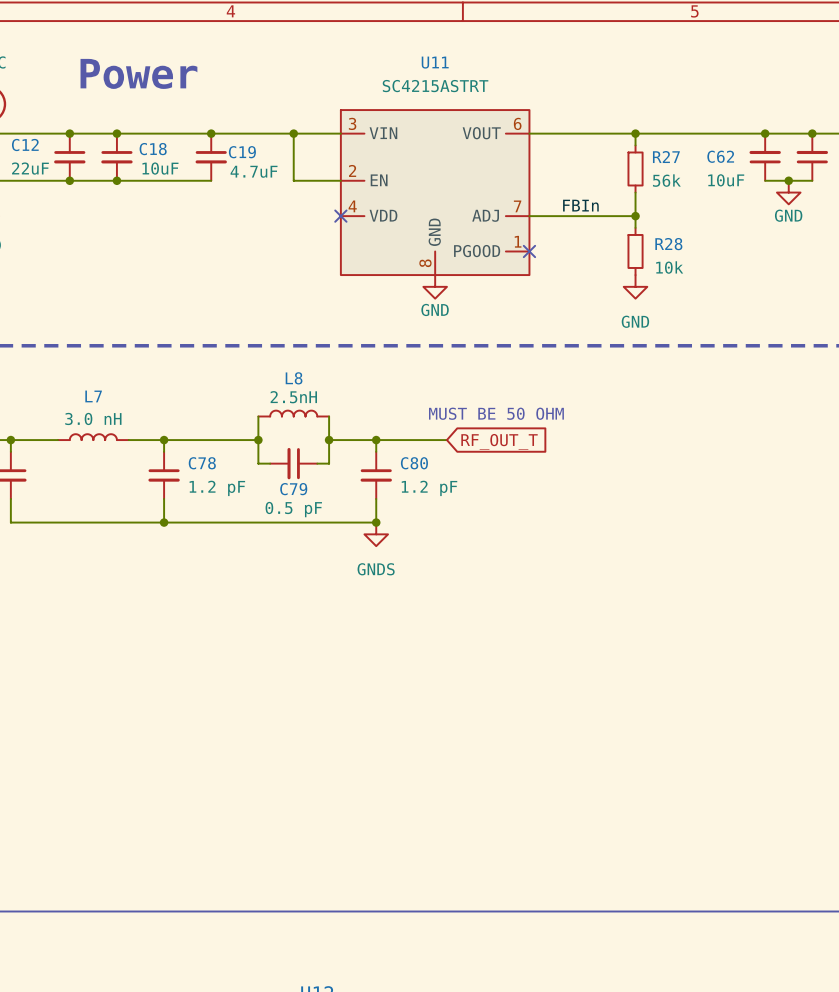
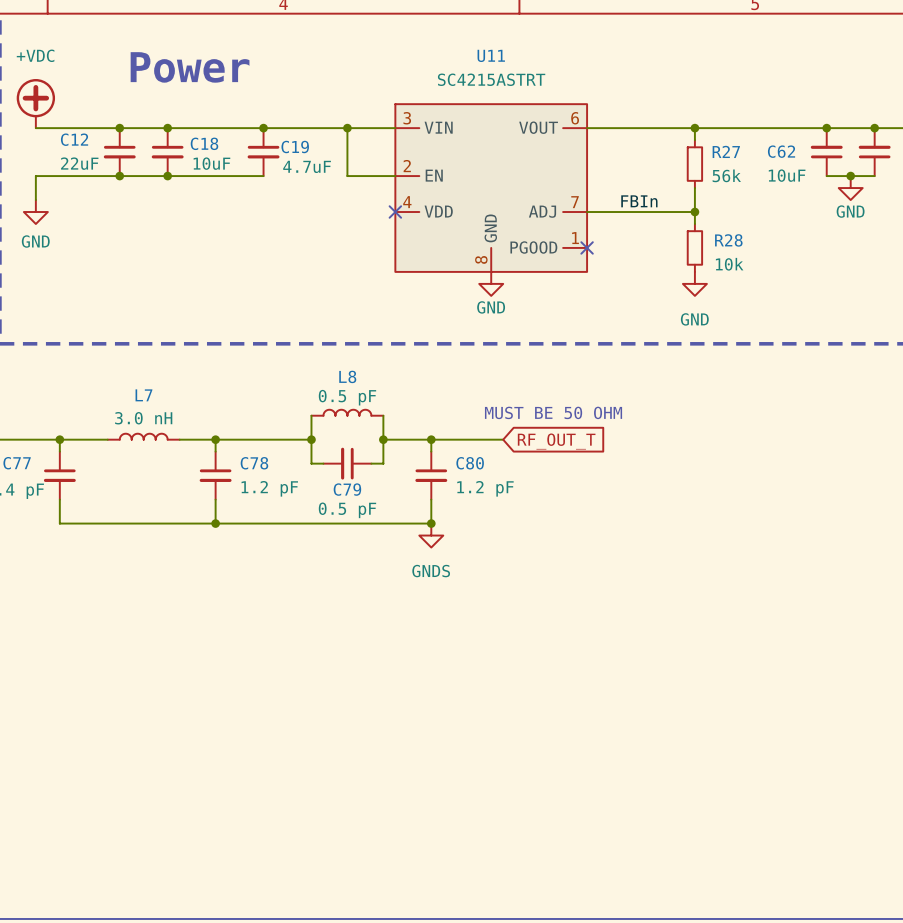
L8 value: 2.5nH (293, 397) -> 0.5 pF (347, 397)

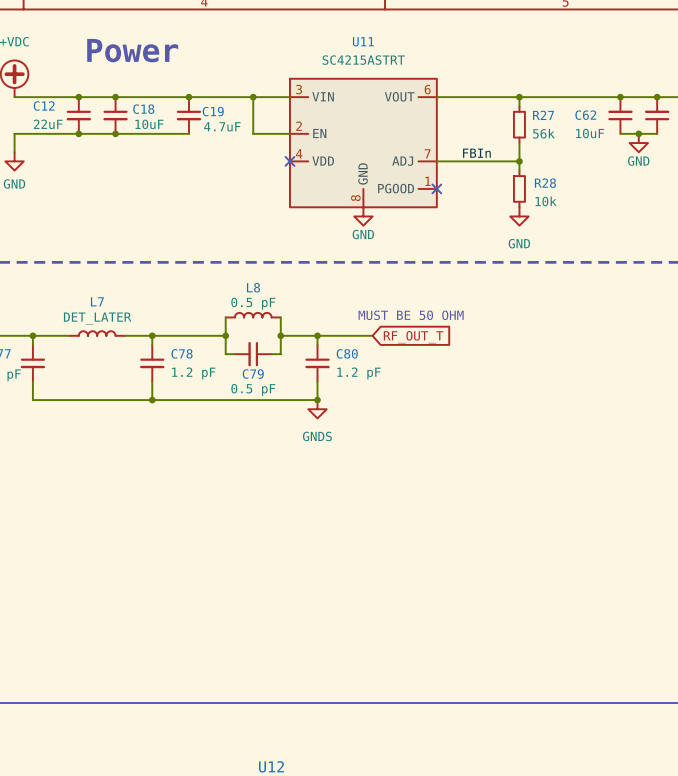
L7 value: 3.0 nH (143, 418) -> DET_LATER (97, 318)

